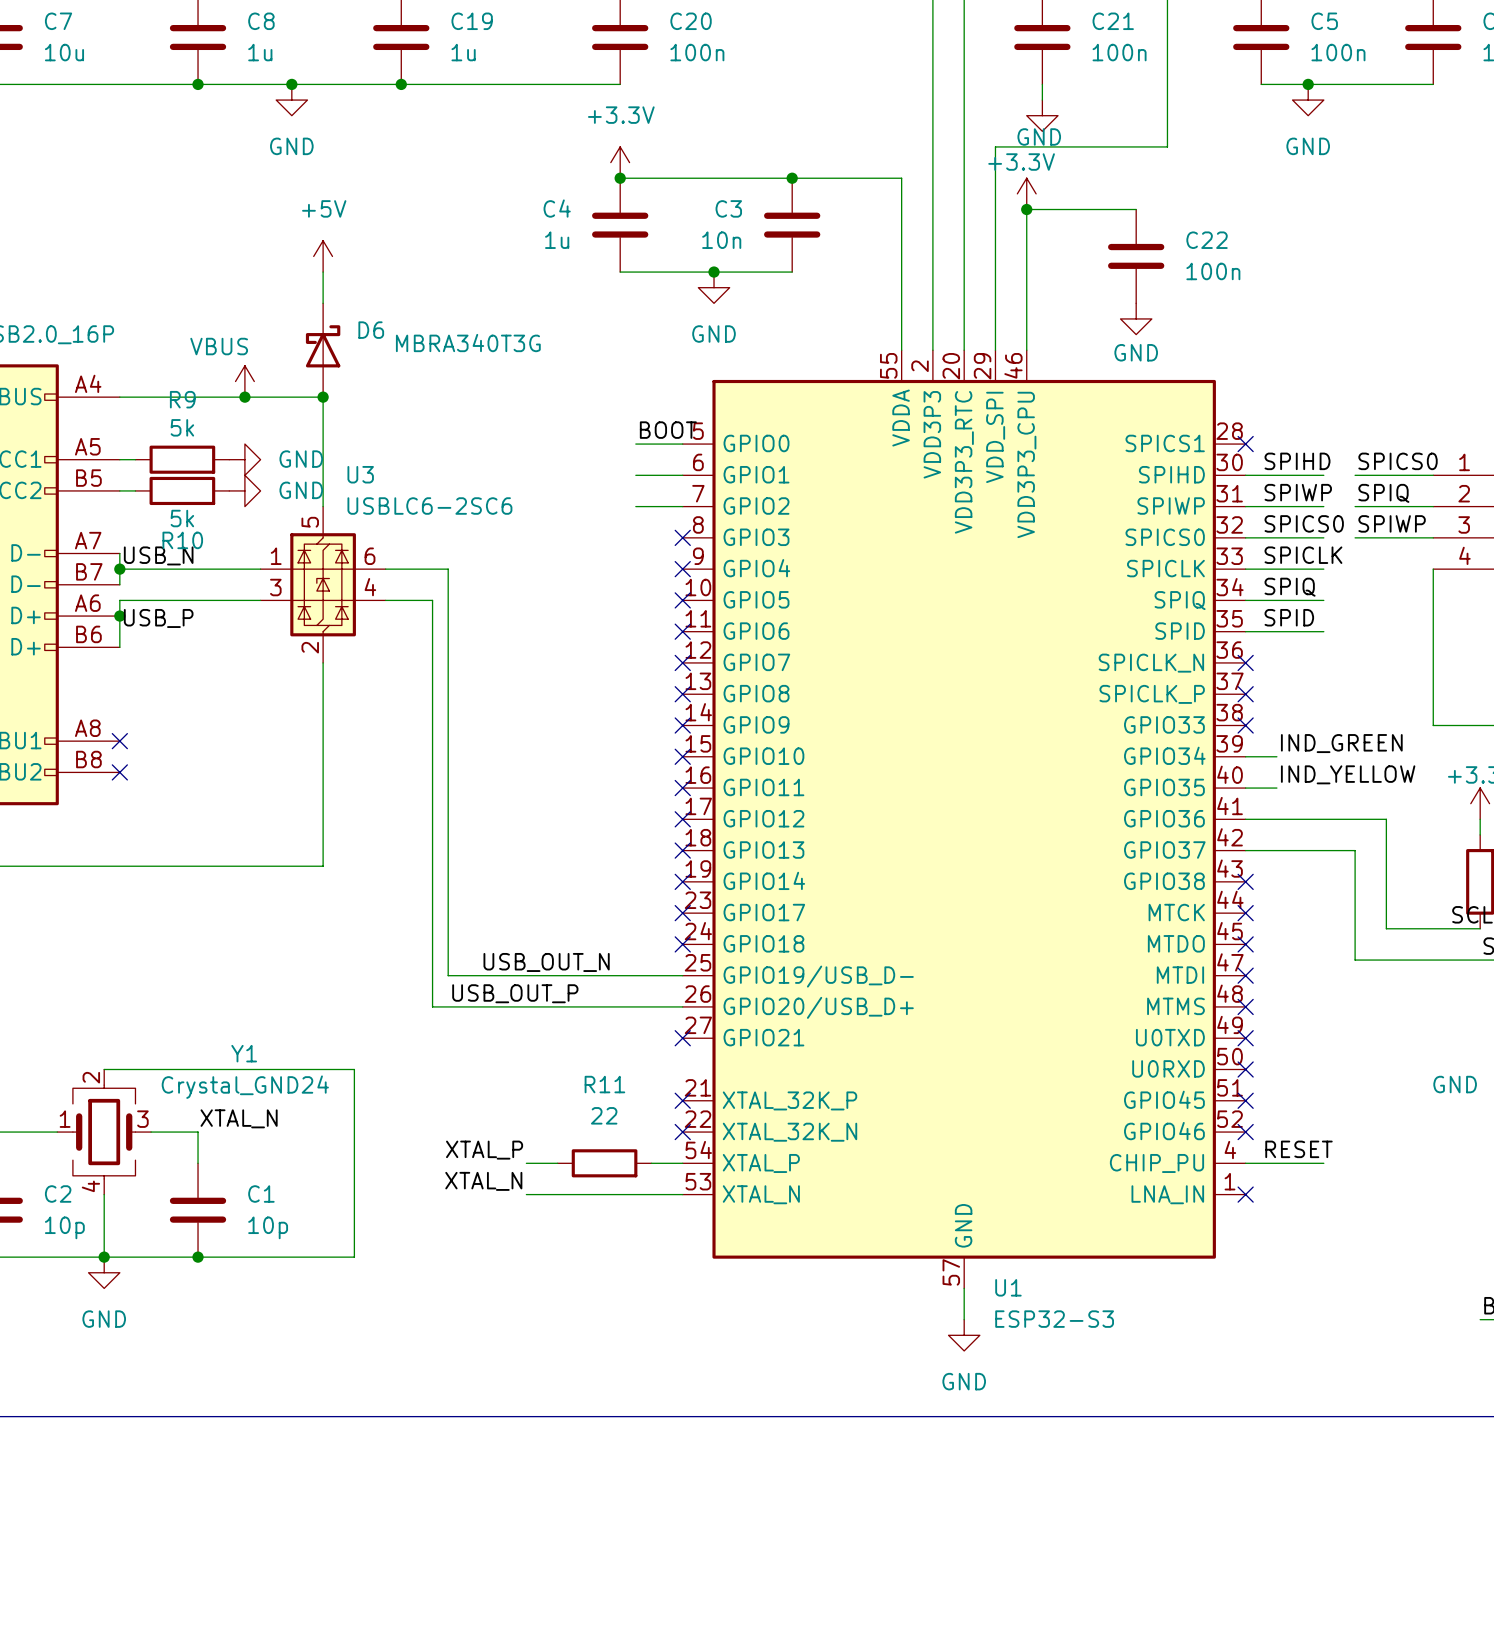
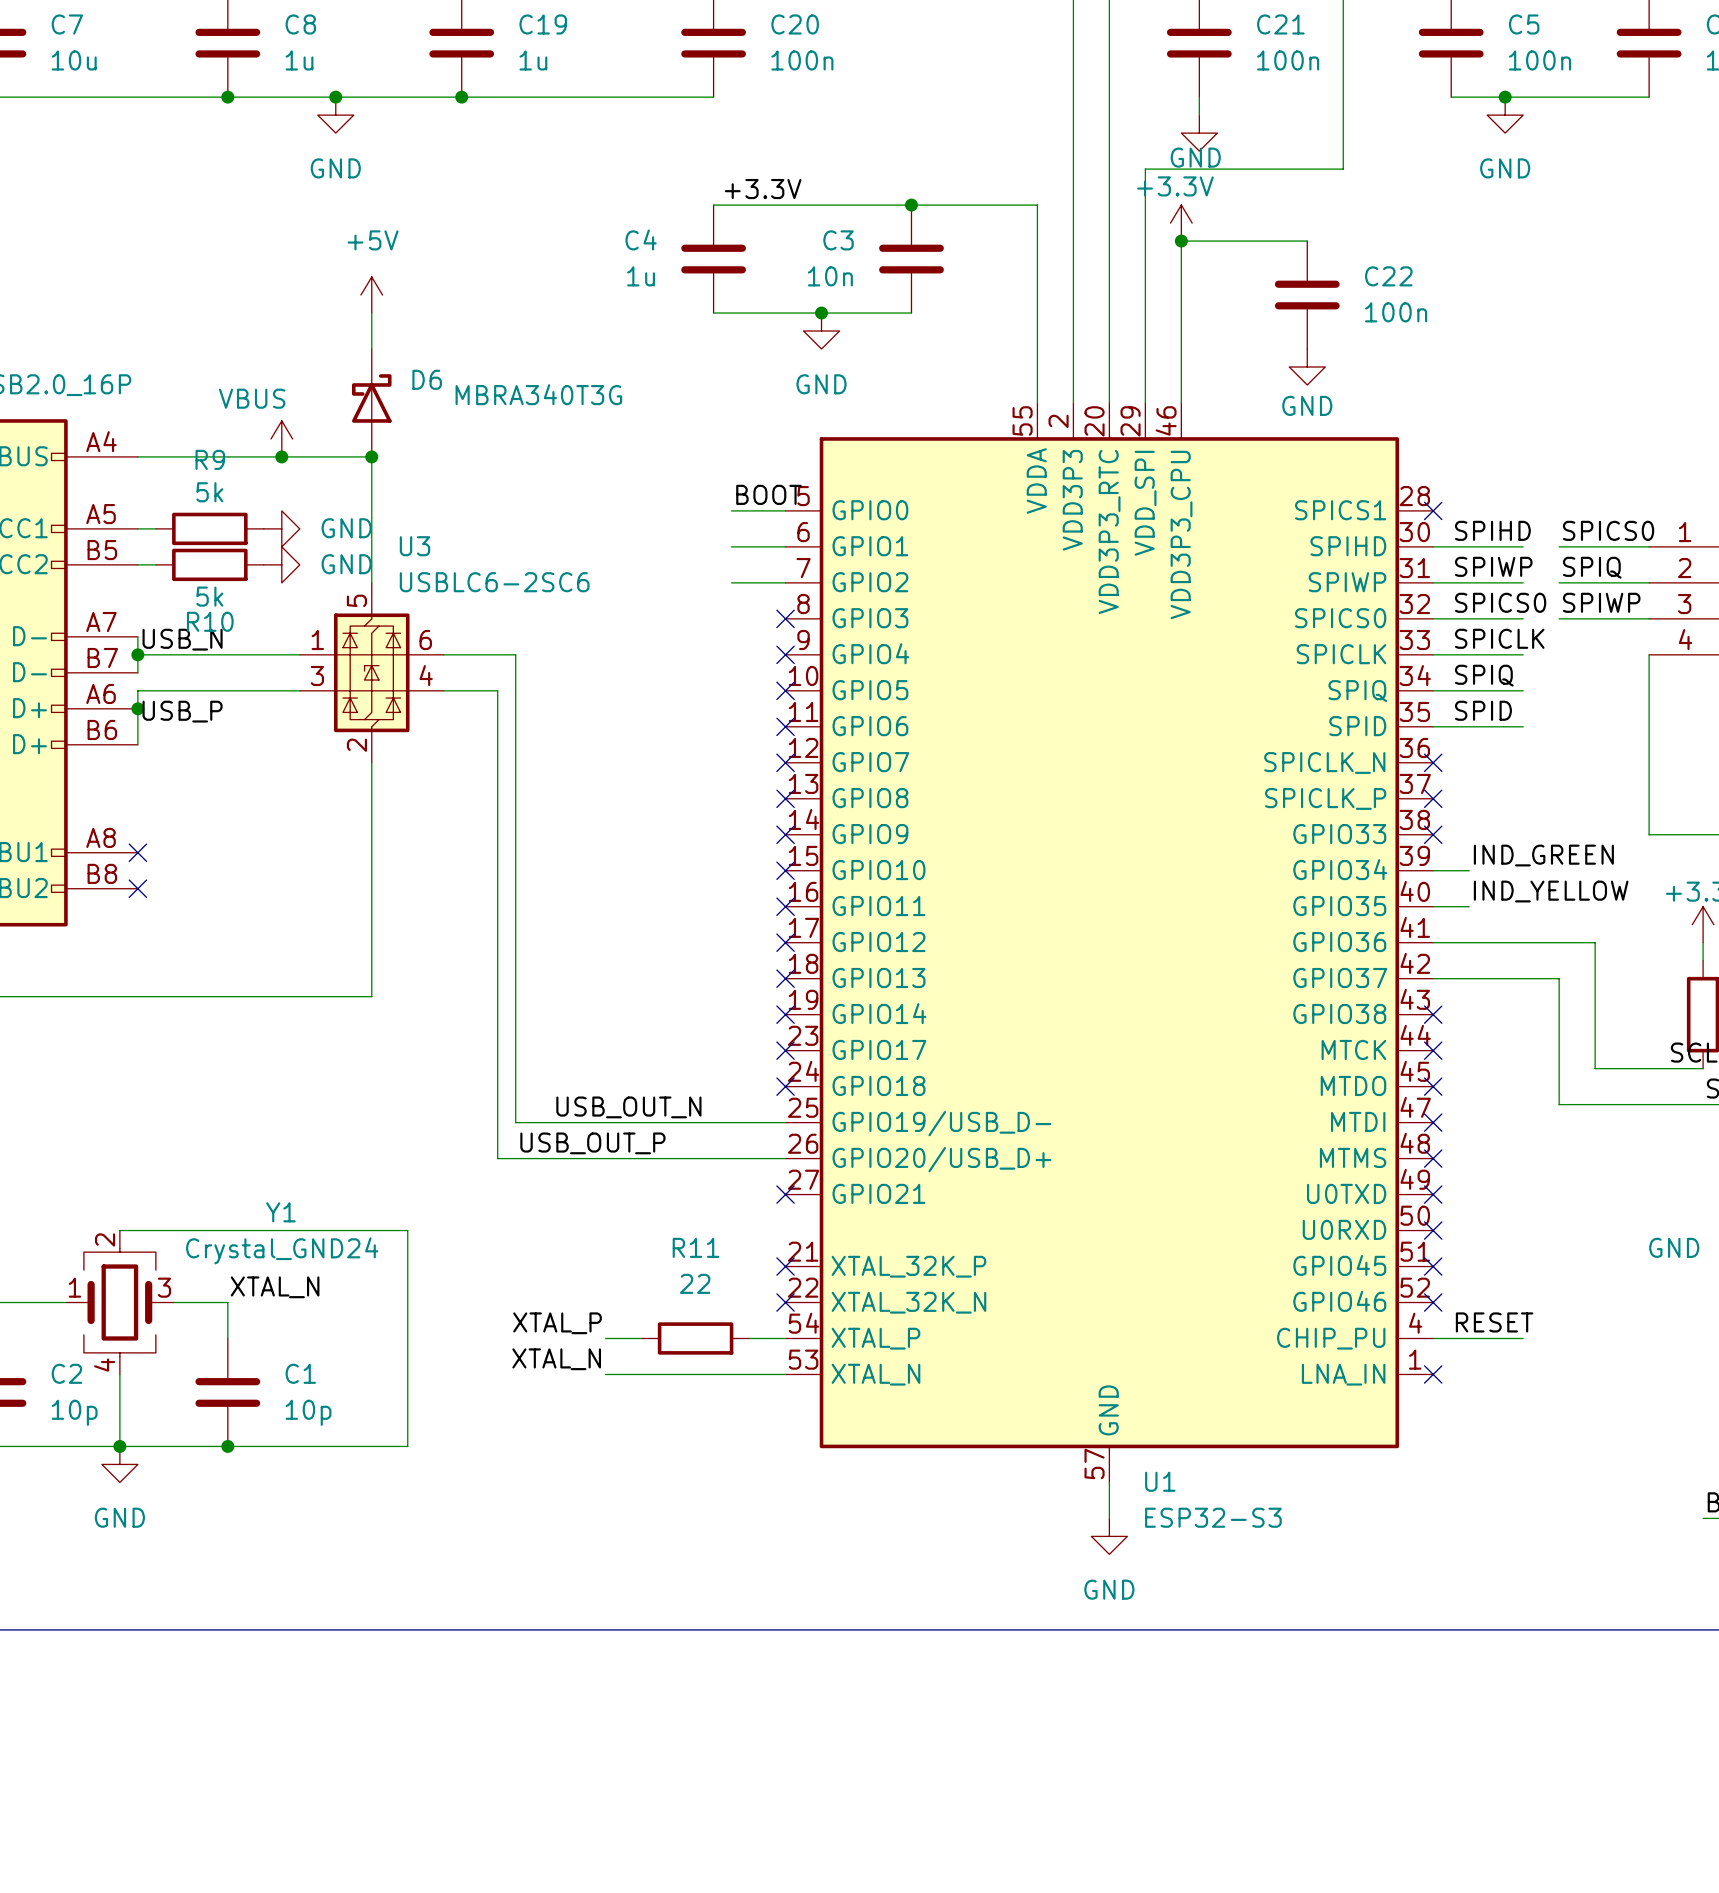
power symbol: +3.3V (620, 162) -> none
label: none -> +3.3V (763, 189)
junction: (620, 178) -> none

